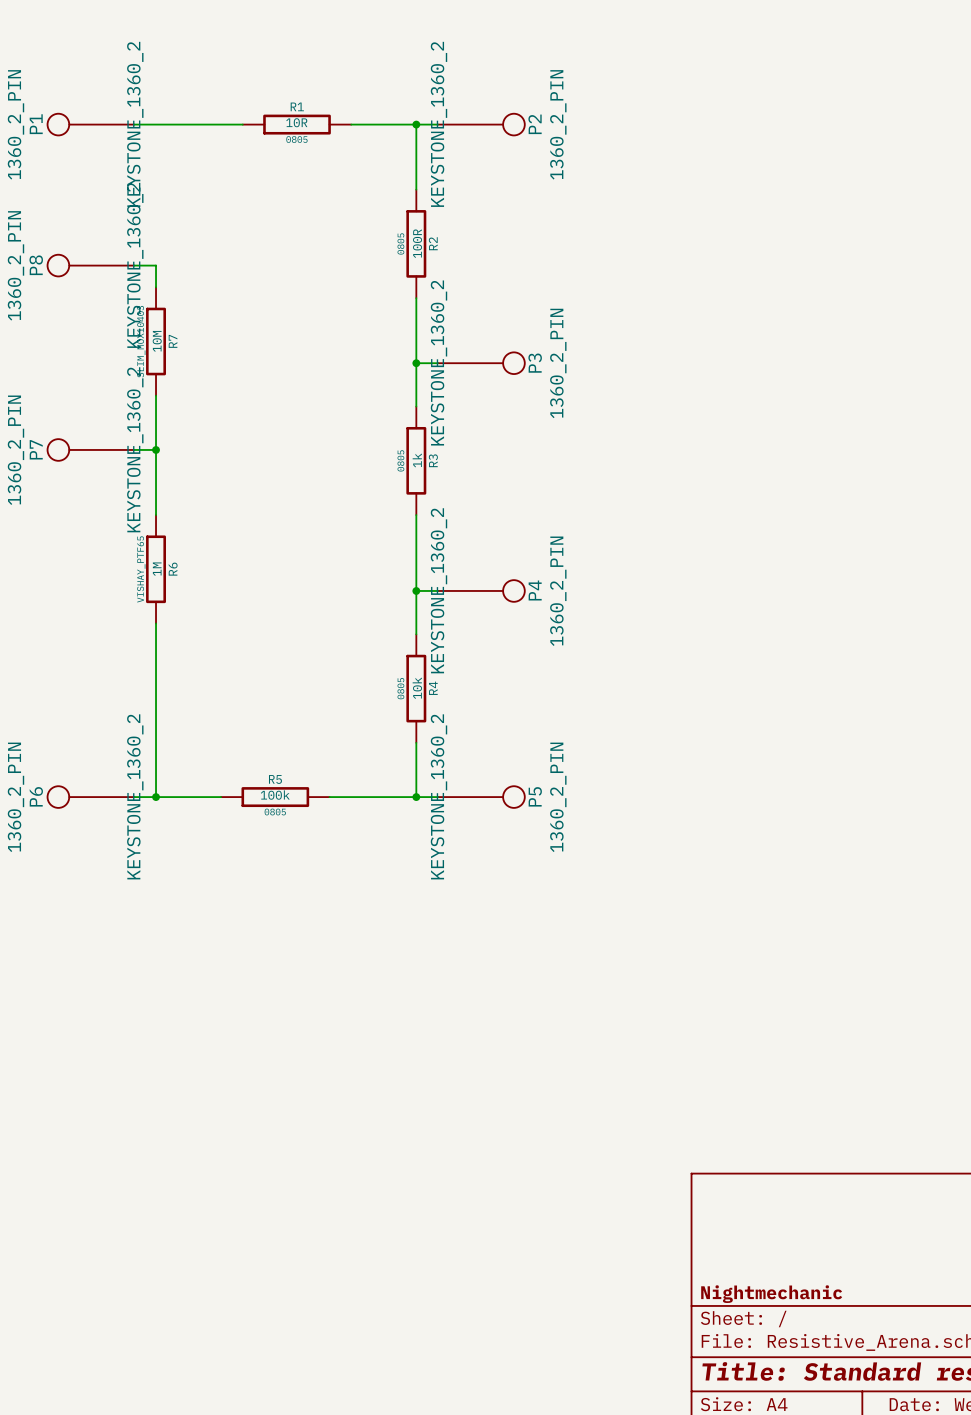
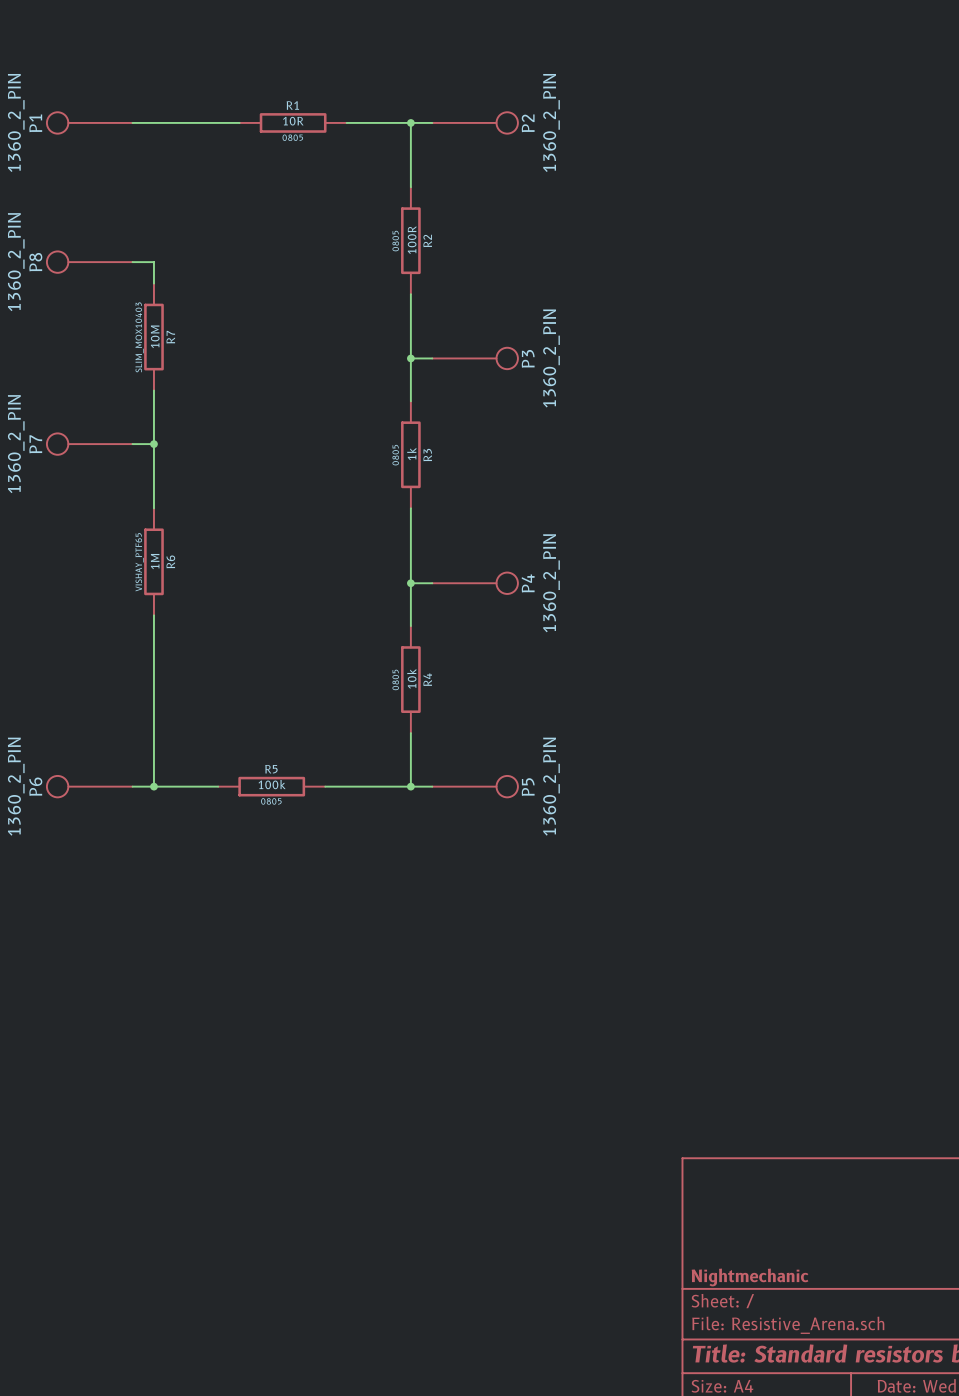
P1 text: KEYSTONE_1360_2 (135, 124) -> none
P2 text: KEYSTONE_1360_2 (439, 124) -> none
P8 text: KEYSTONE_1360_2 (135, 265) -> none
P3 text: KEYSTONE_1360_2 (439, 363) -> none
P7 text: KEYSTONE_1360_2 (135, 449) -> none
P4 text: KEYSTONE_1360_2 (439, 590) -> none
P6 text: KEYSTONE_1360_2 (135, 796) -> none
P5 text: KEYSTONE_1360_2 (439, 796) -> none

